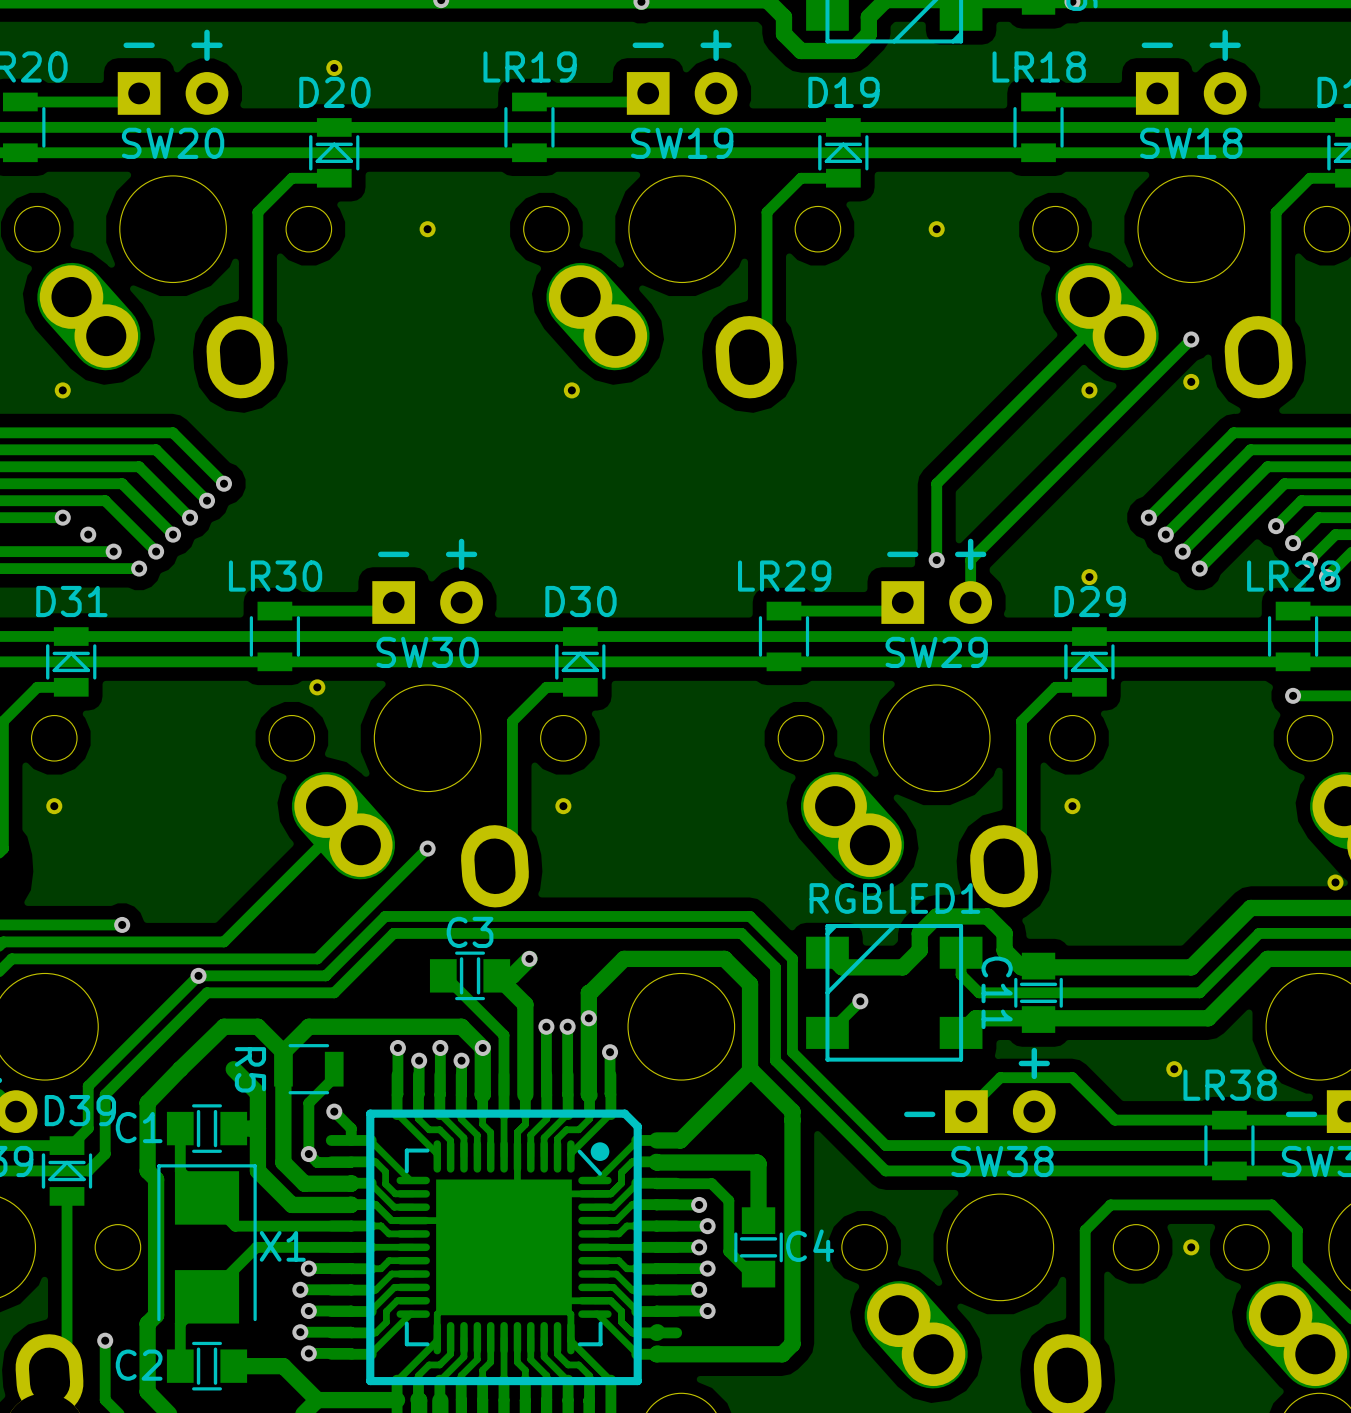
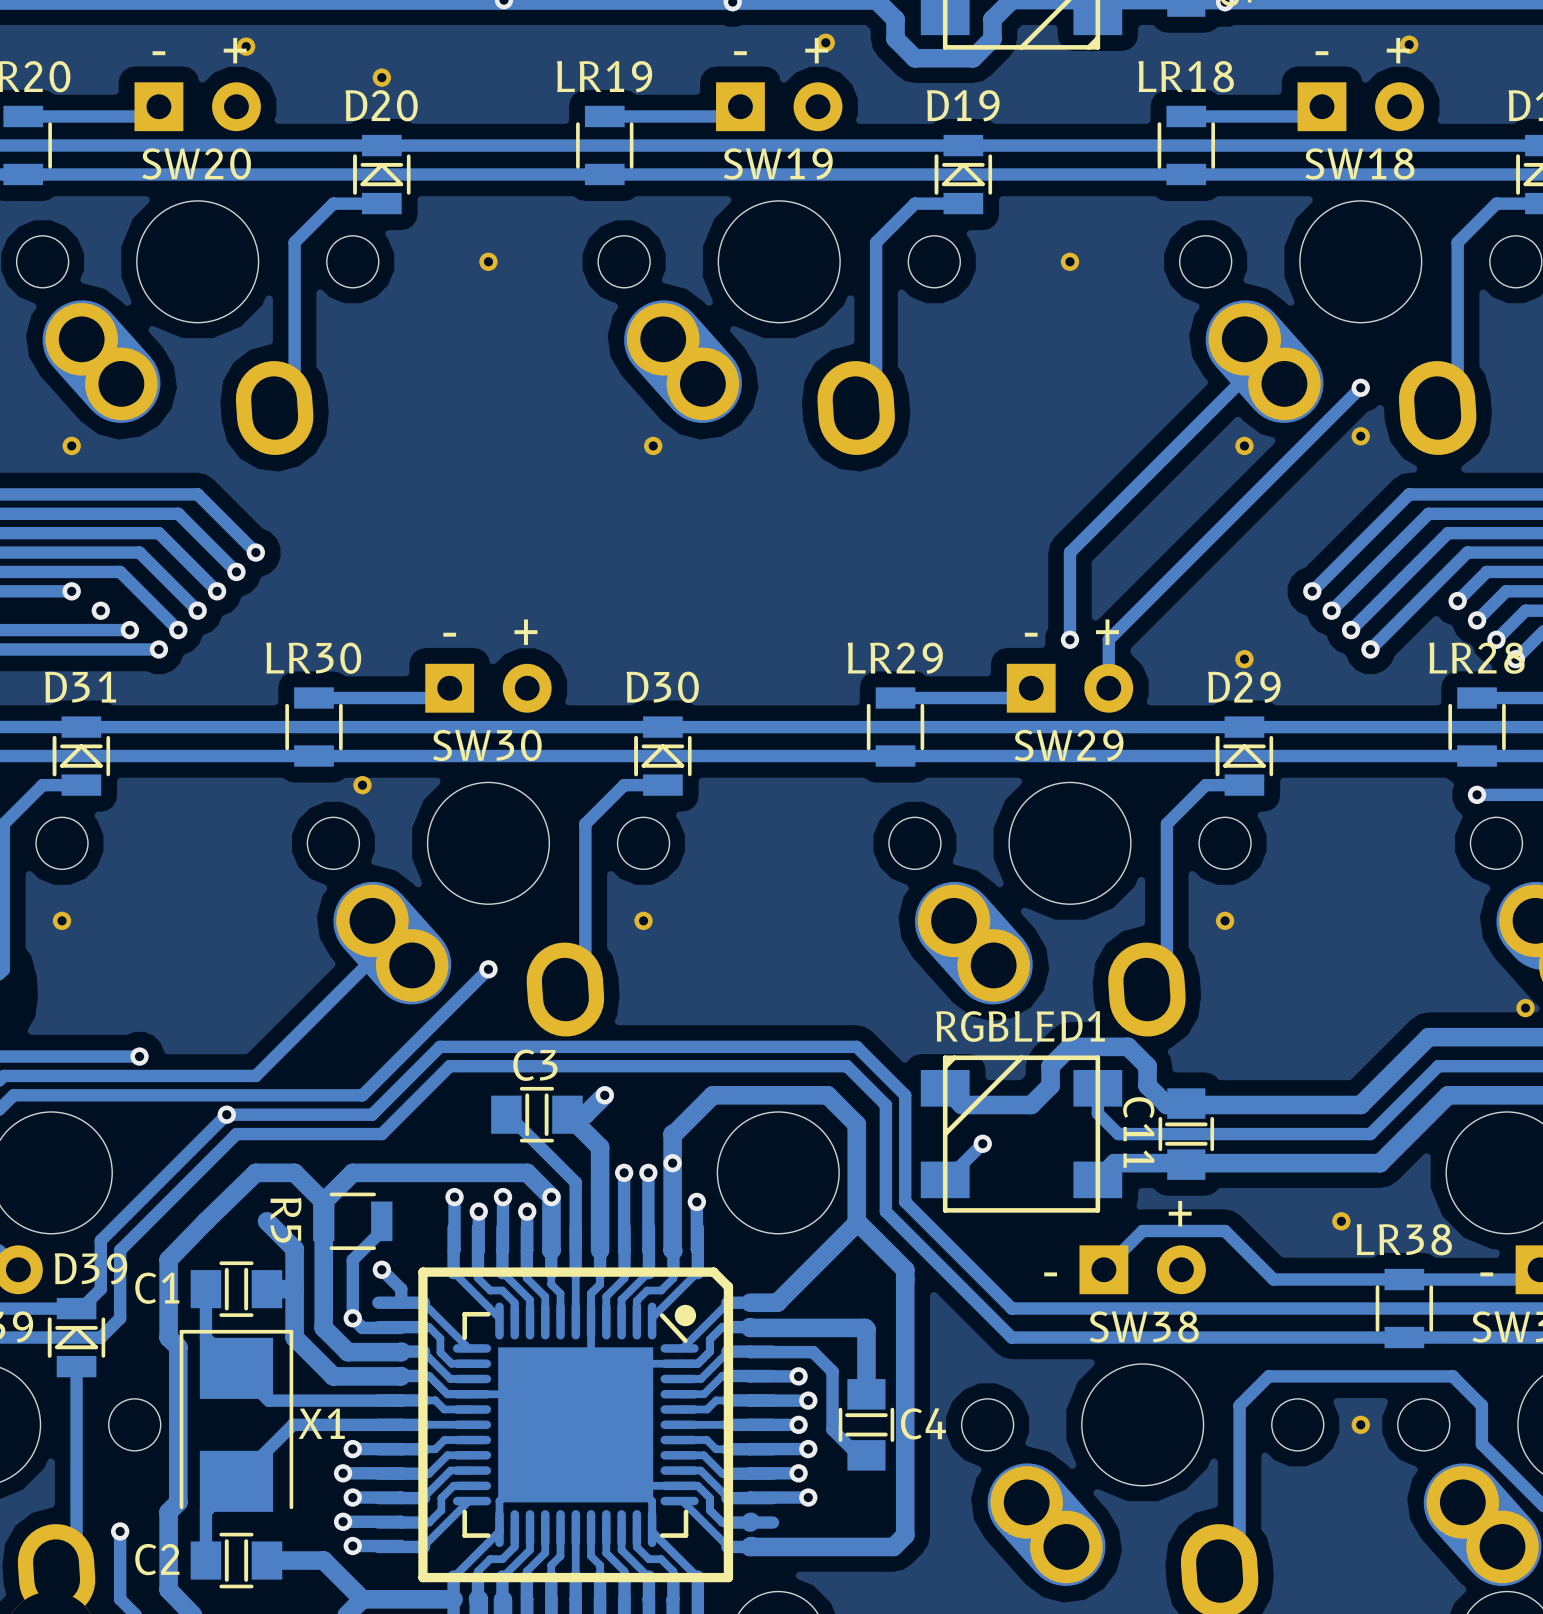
part: none -> (825, 42)
part: none -> (1409, 44)
part: none -> (246, 46)

